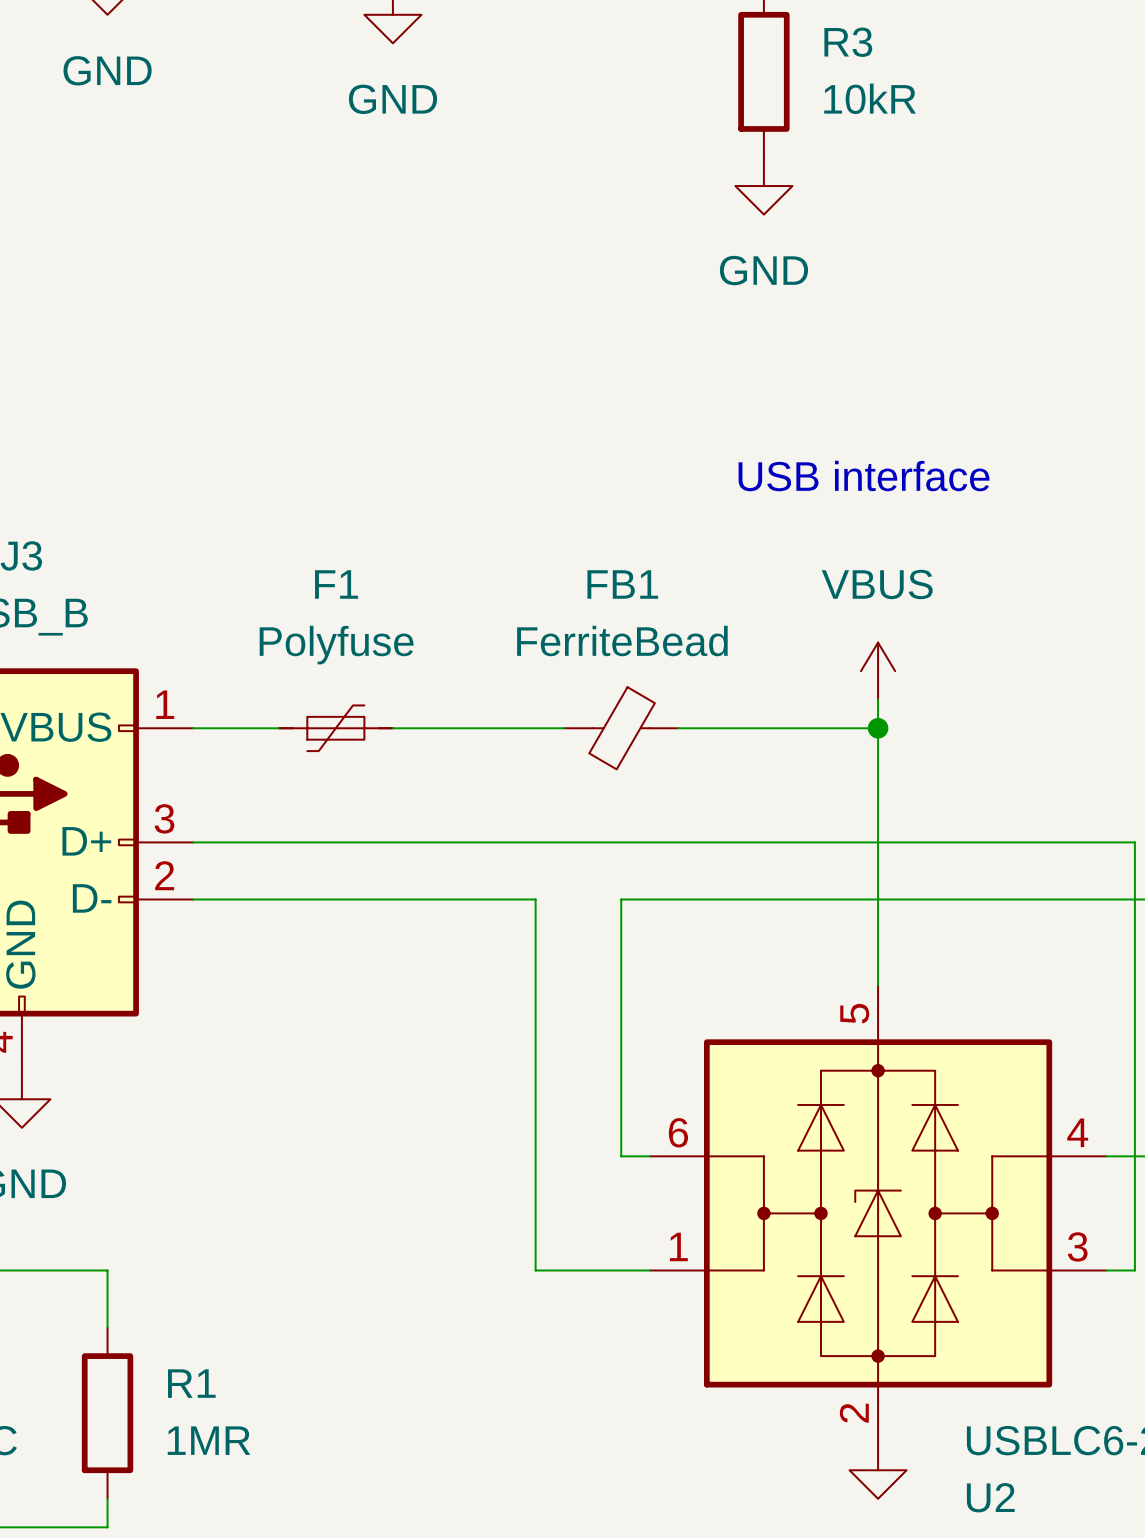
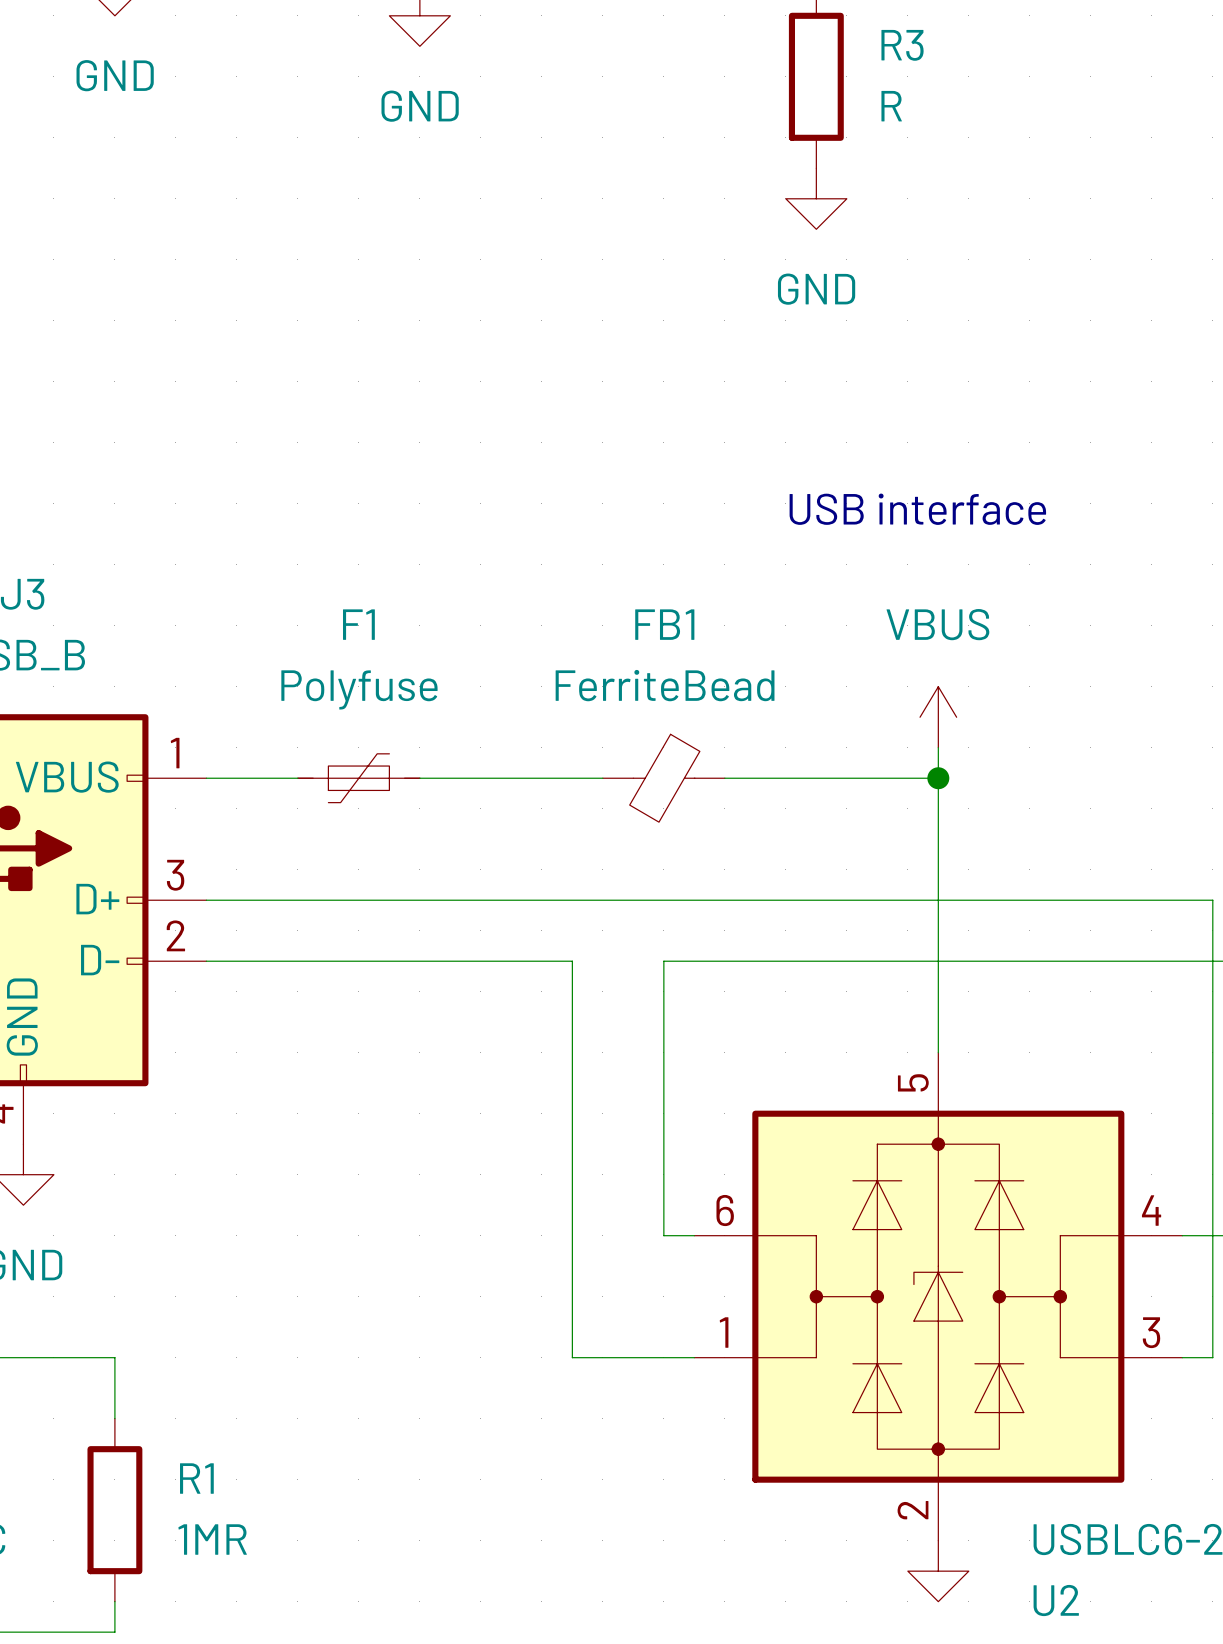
R3 value: 10kR (870, 98) -> R (891, 106)

